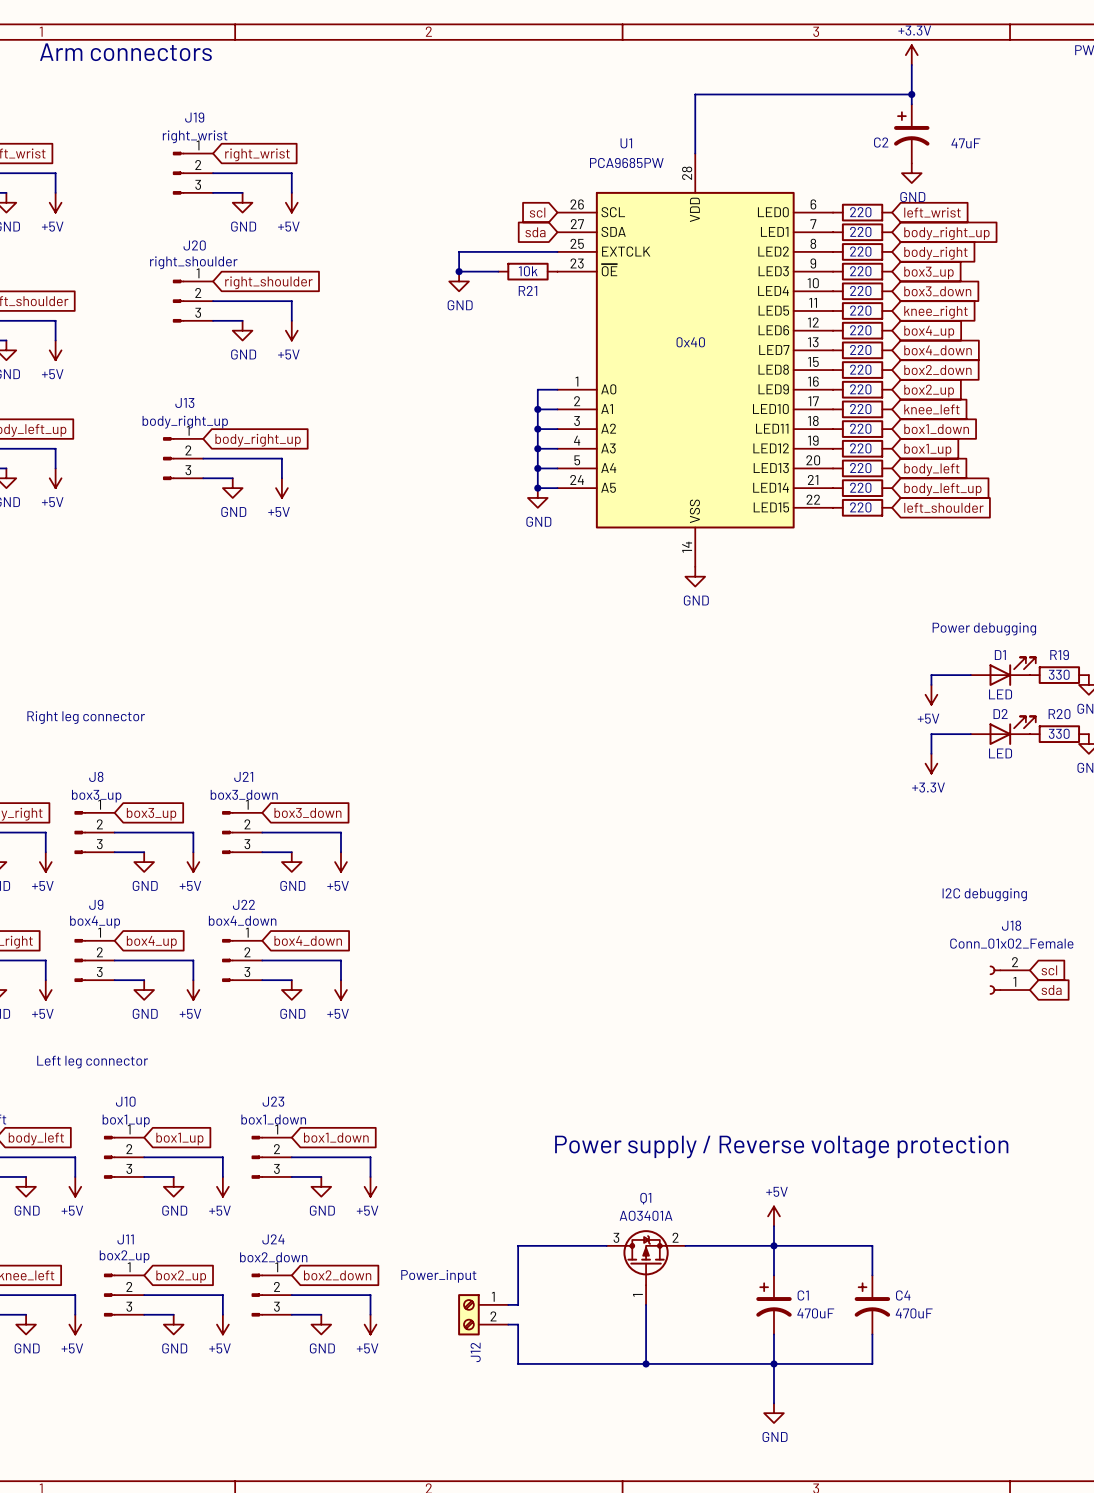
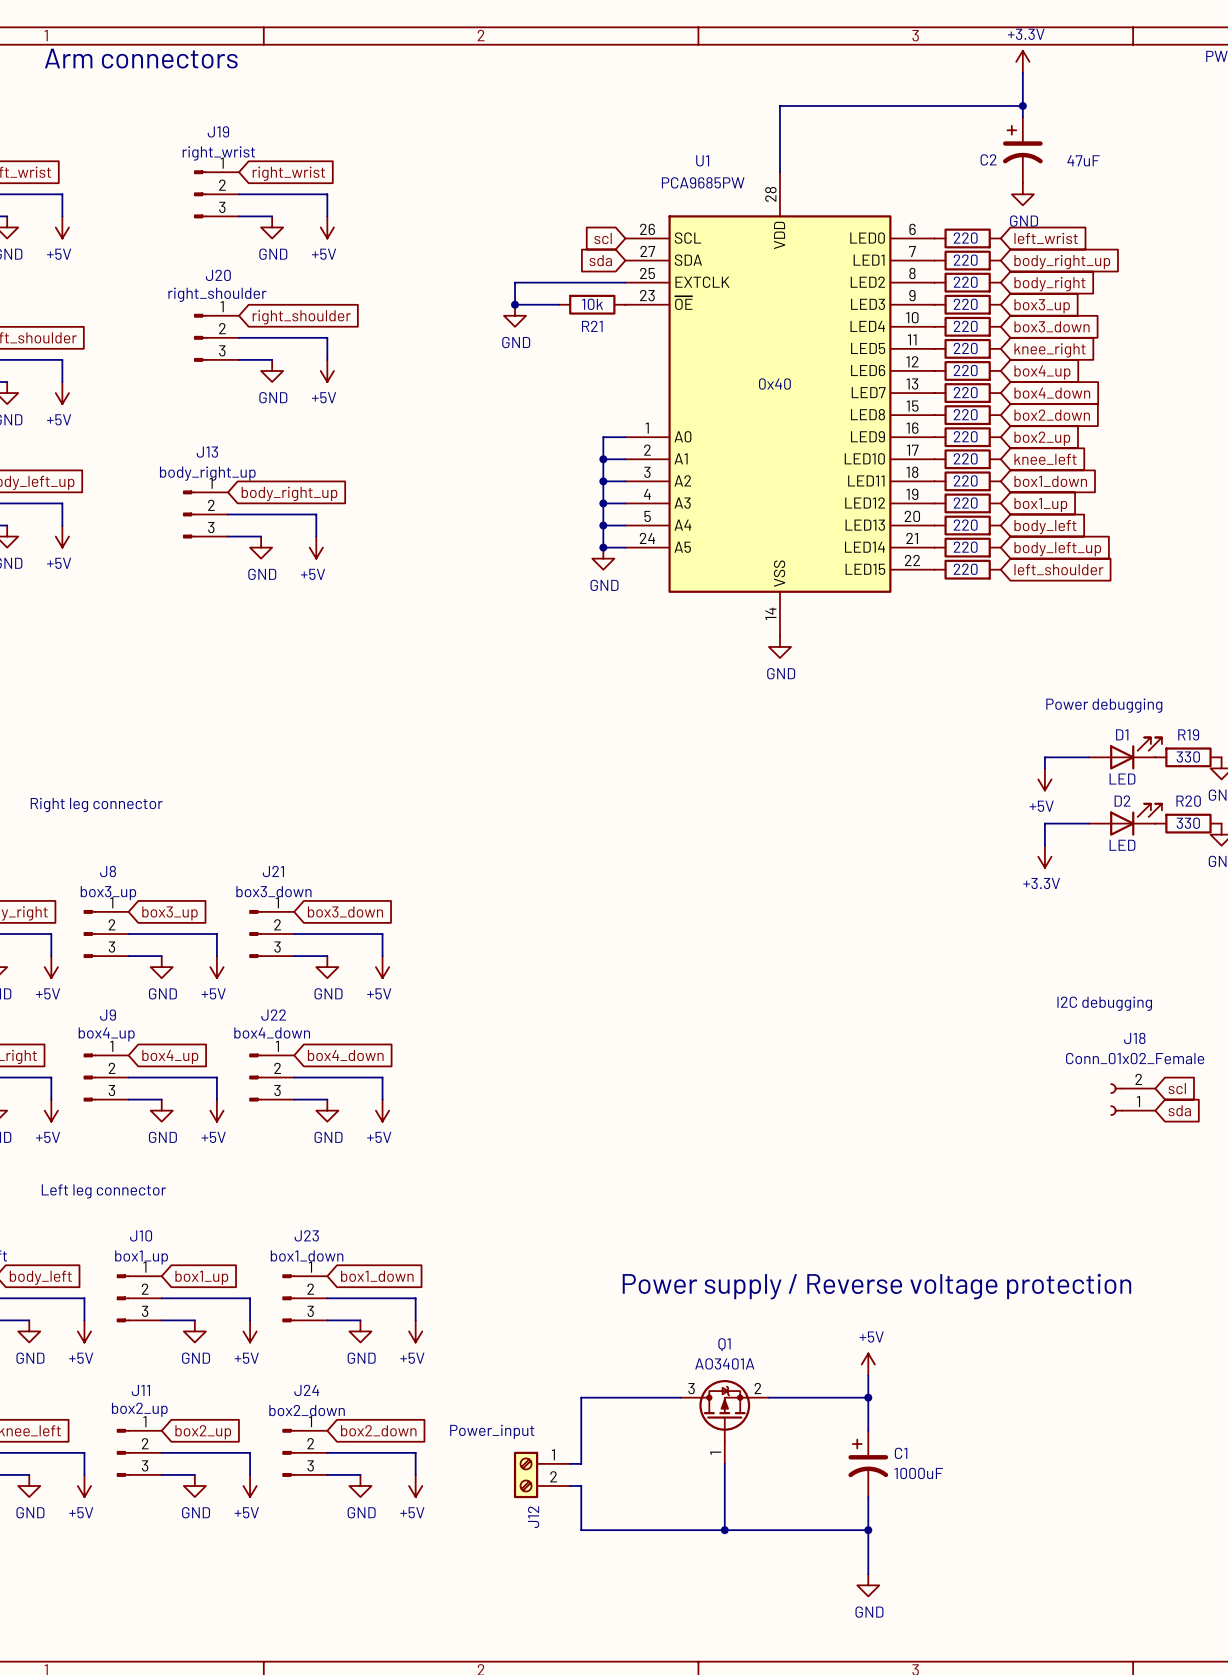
wire: (773, 1245) (872, 1245) (872, 1275) -> none
C4: 470uF (872, 1304) -> none
C1 value: 470uF (815, 1313) -> 1000uF (918, 1473)
wire: (872, 1334) (872, 1363) (773, 1363) -> none

